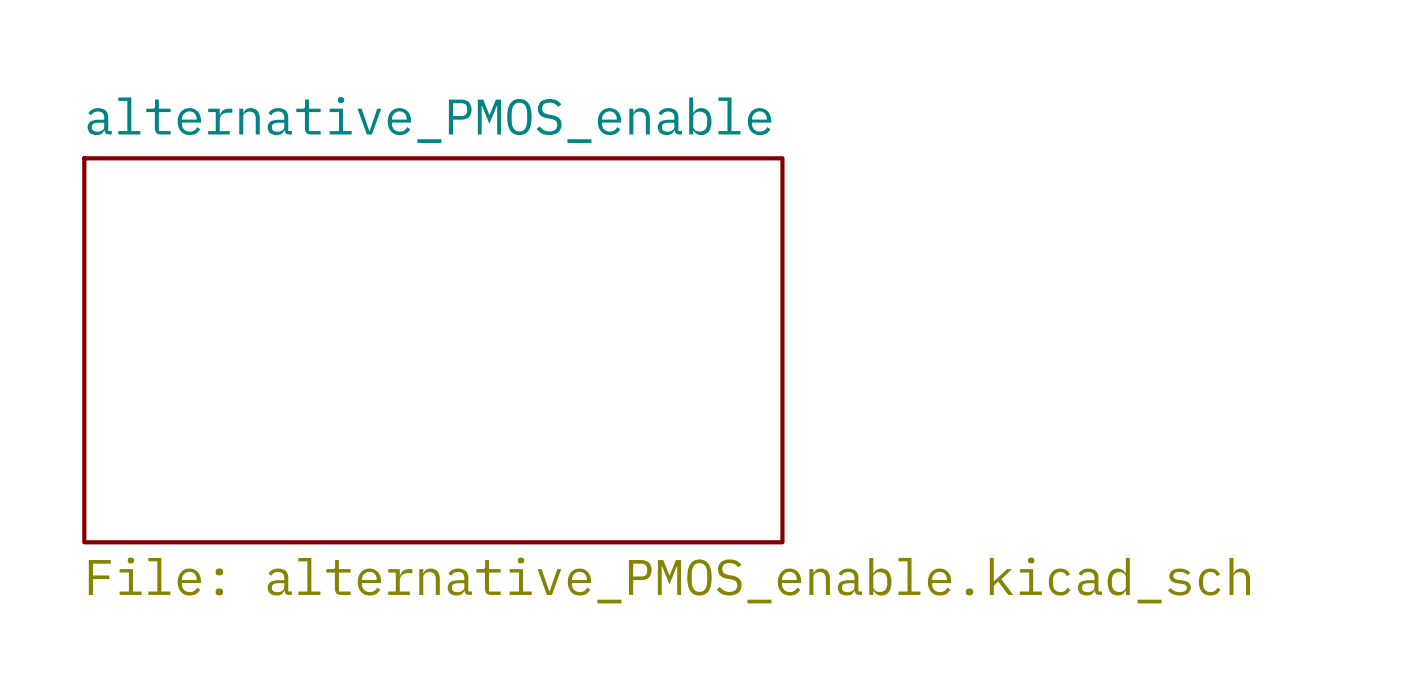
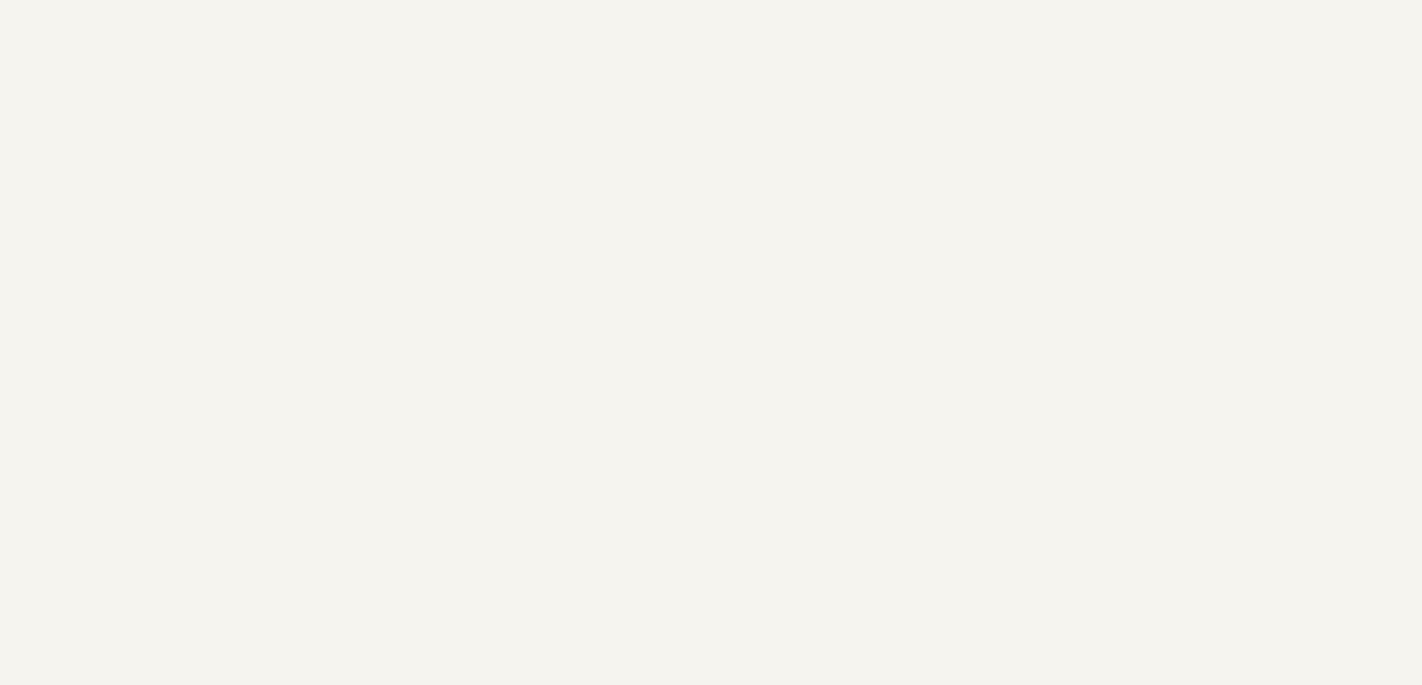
sheet alternative_PMOS_enable: File: alternative_PMOS_enable.kicad_sch (433, 350) -> none

